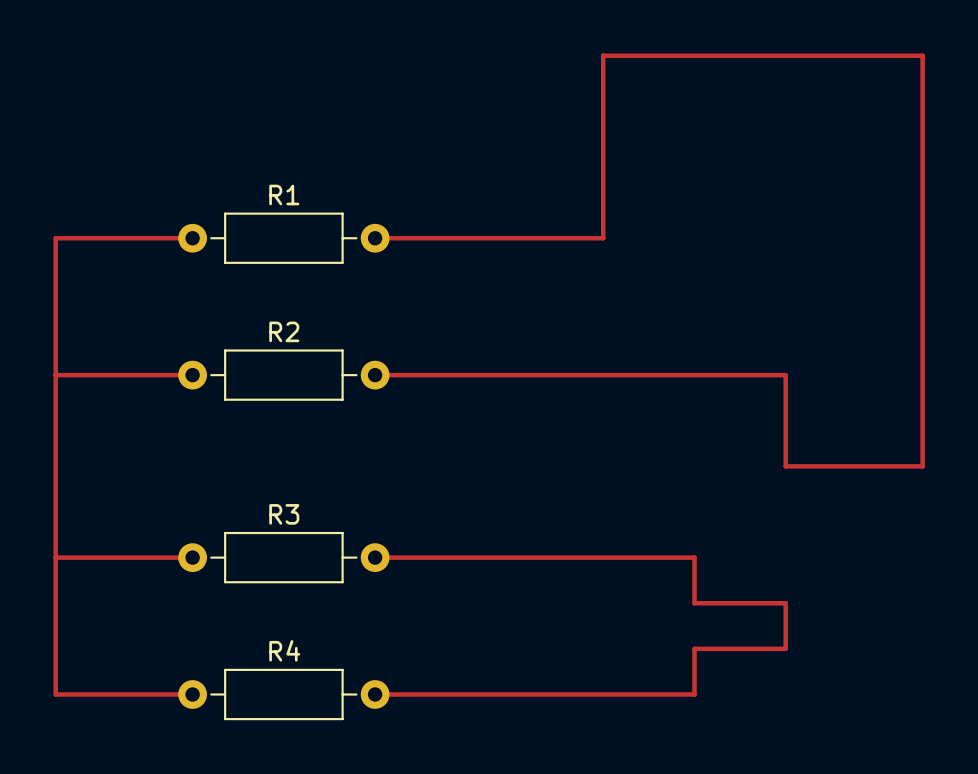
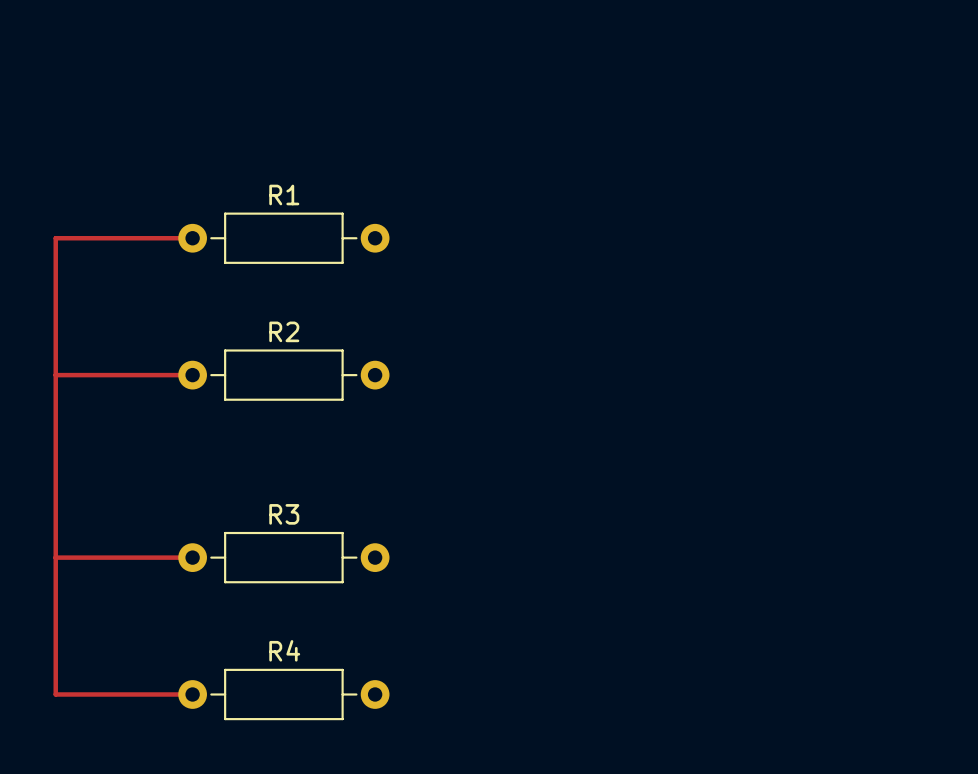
top track: (375, 238) (603, 238) (603, 55) (922, 55) (922, 466) (785, 466) (785, 375) (375, 375) -> none
top track: (375, 557) (694, 557) (694, 603) (785, 603) (785, 648) (694, 648) (694, 694) (375, 694) -> none

